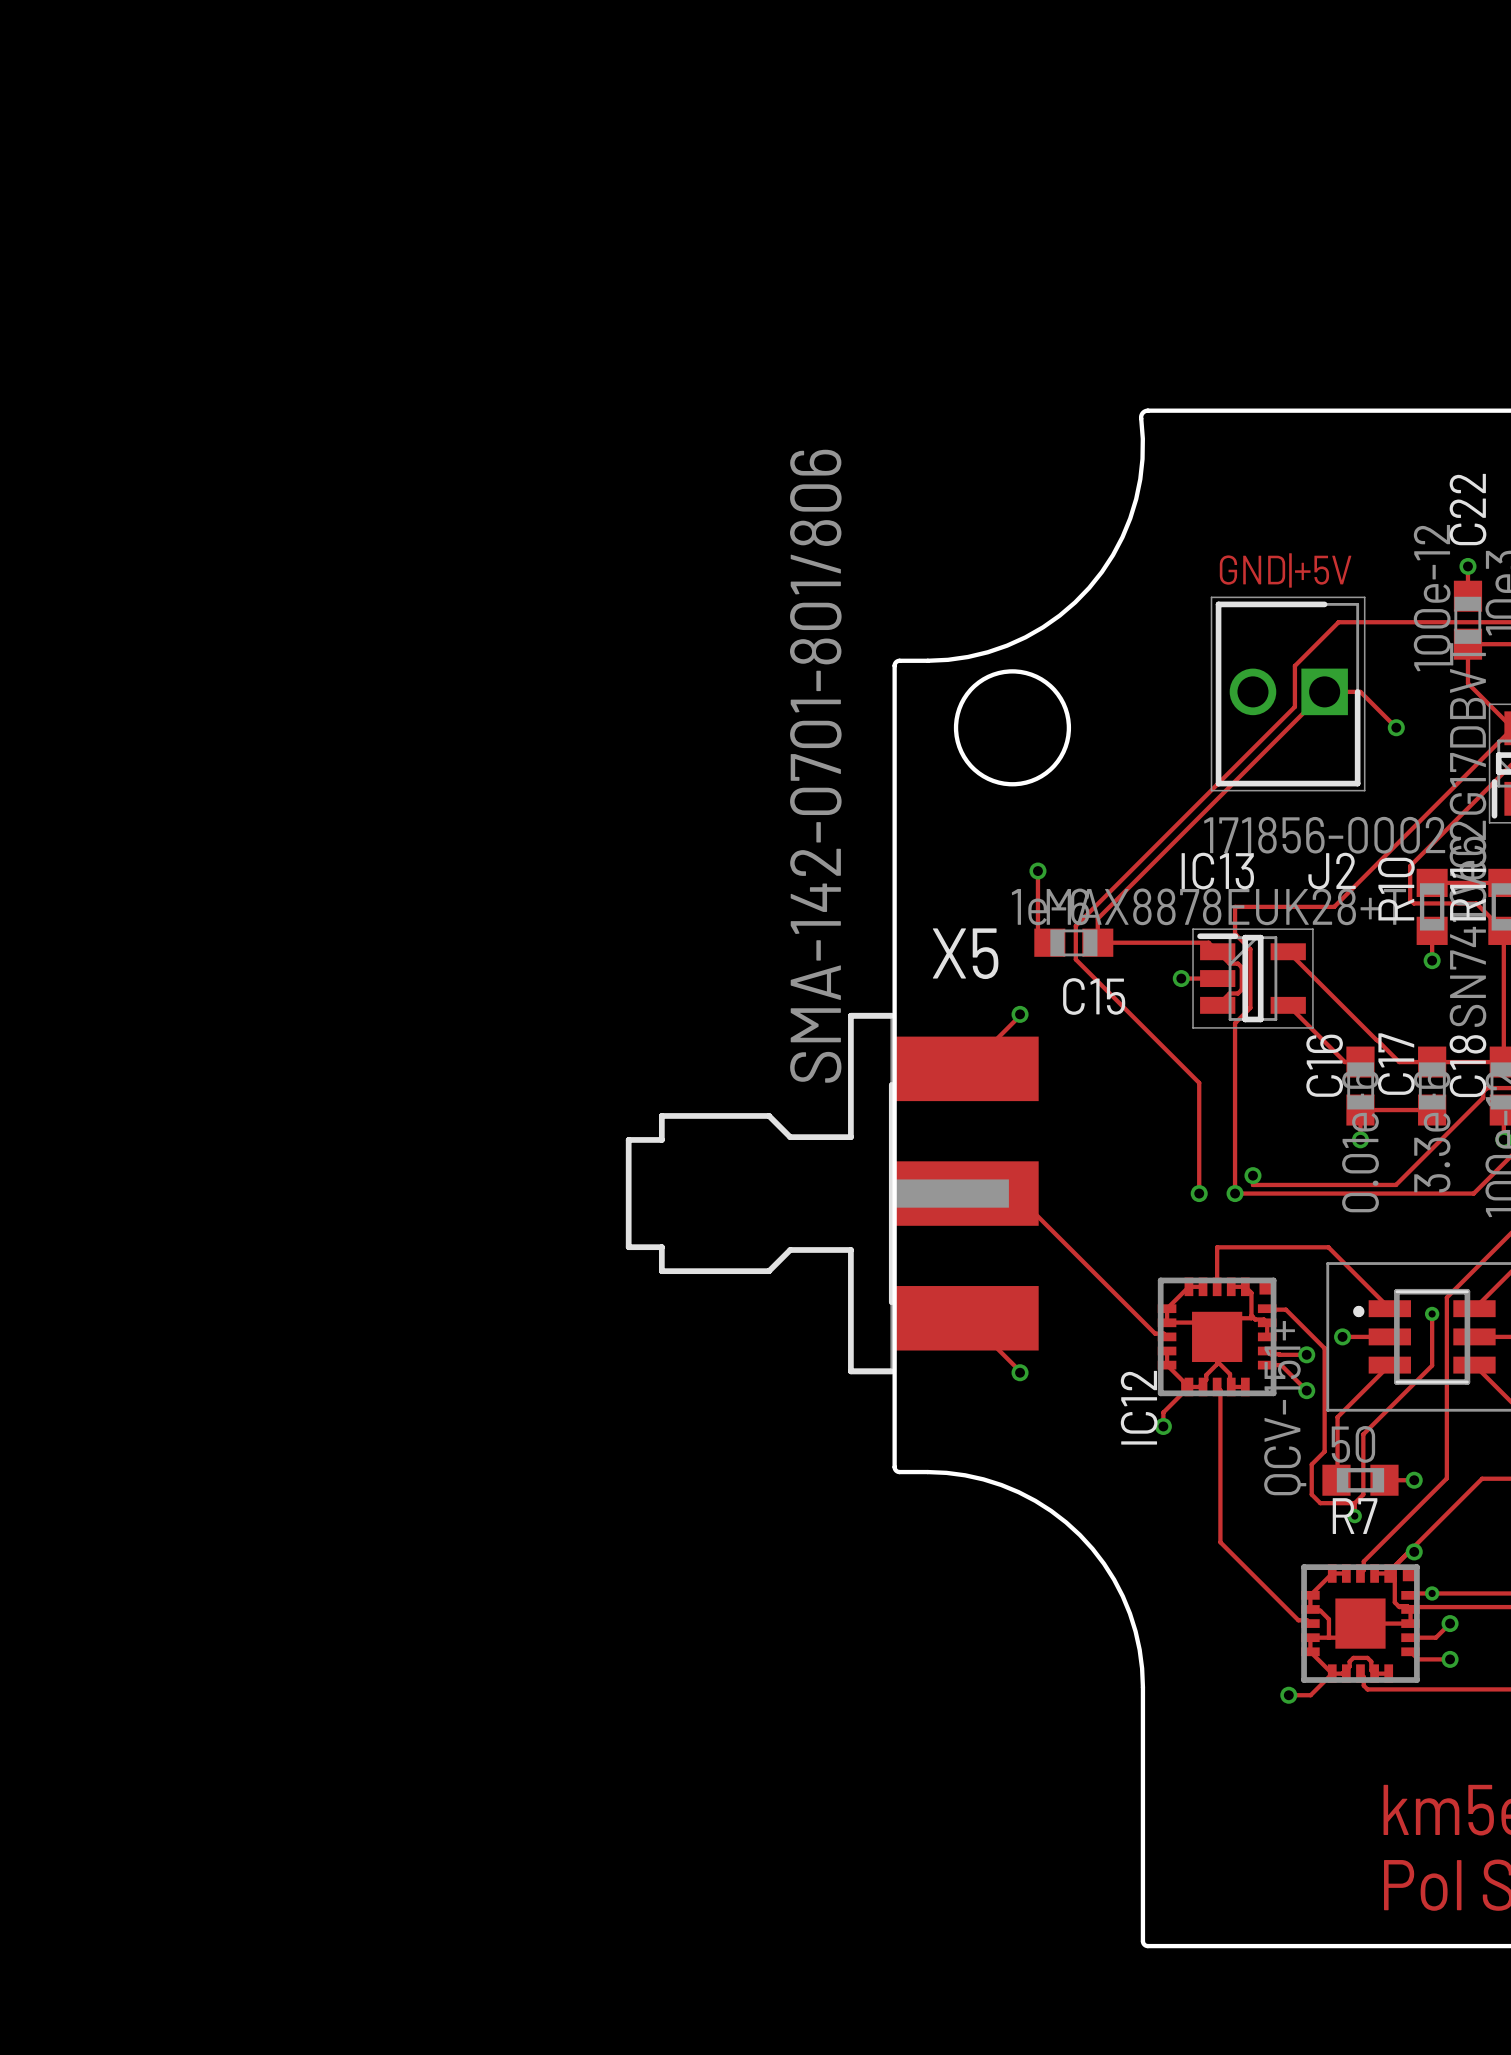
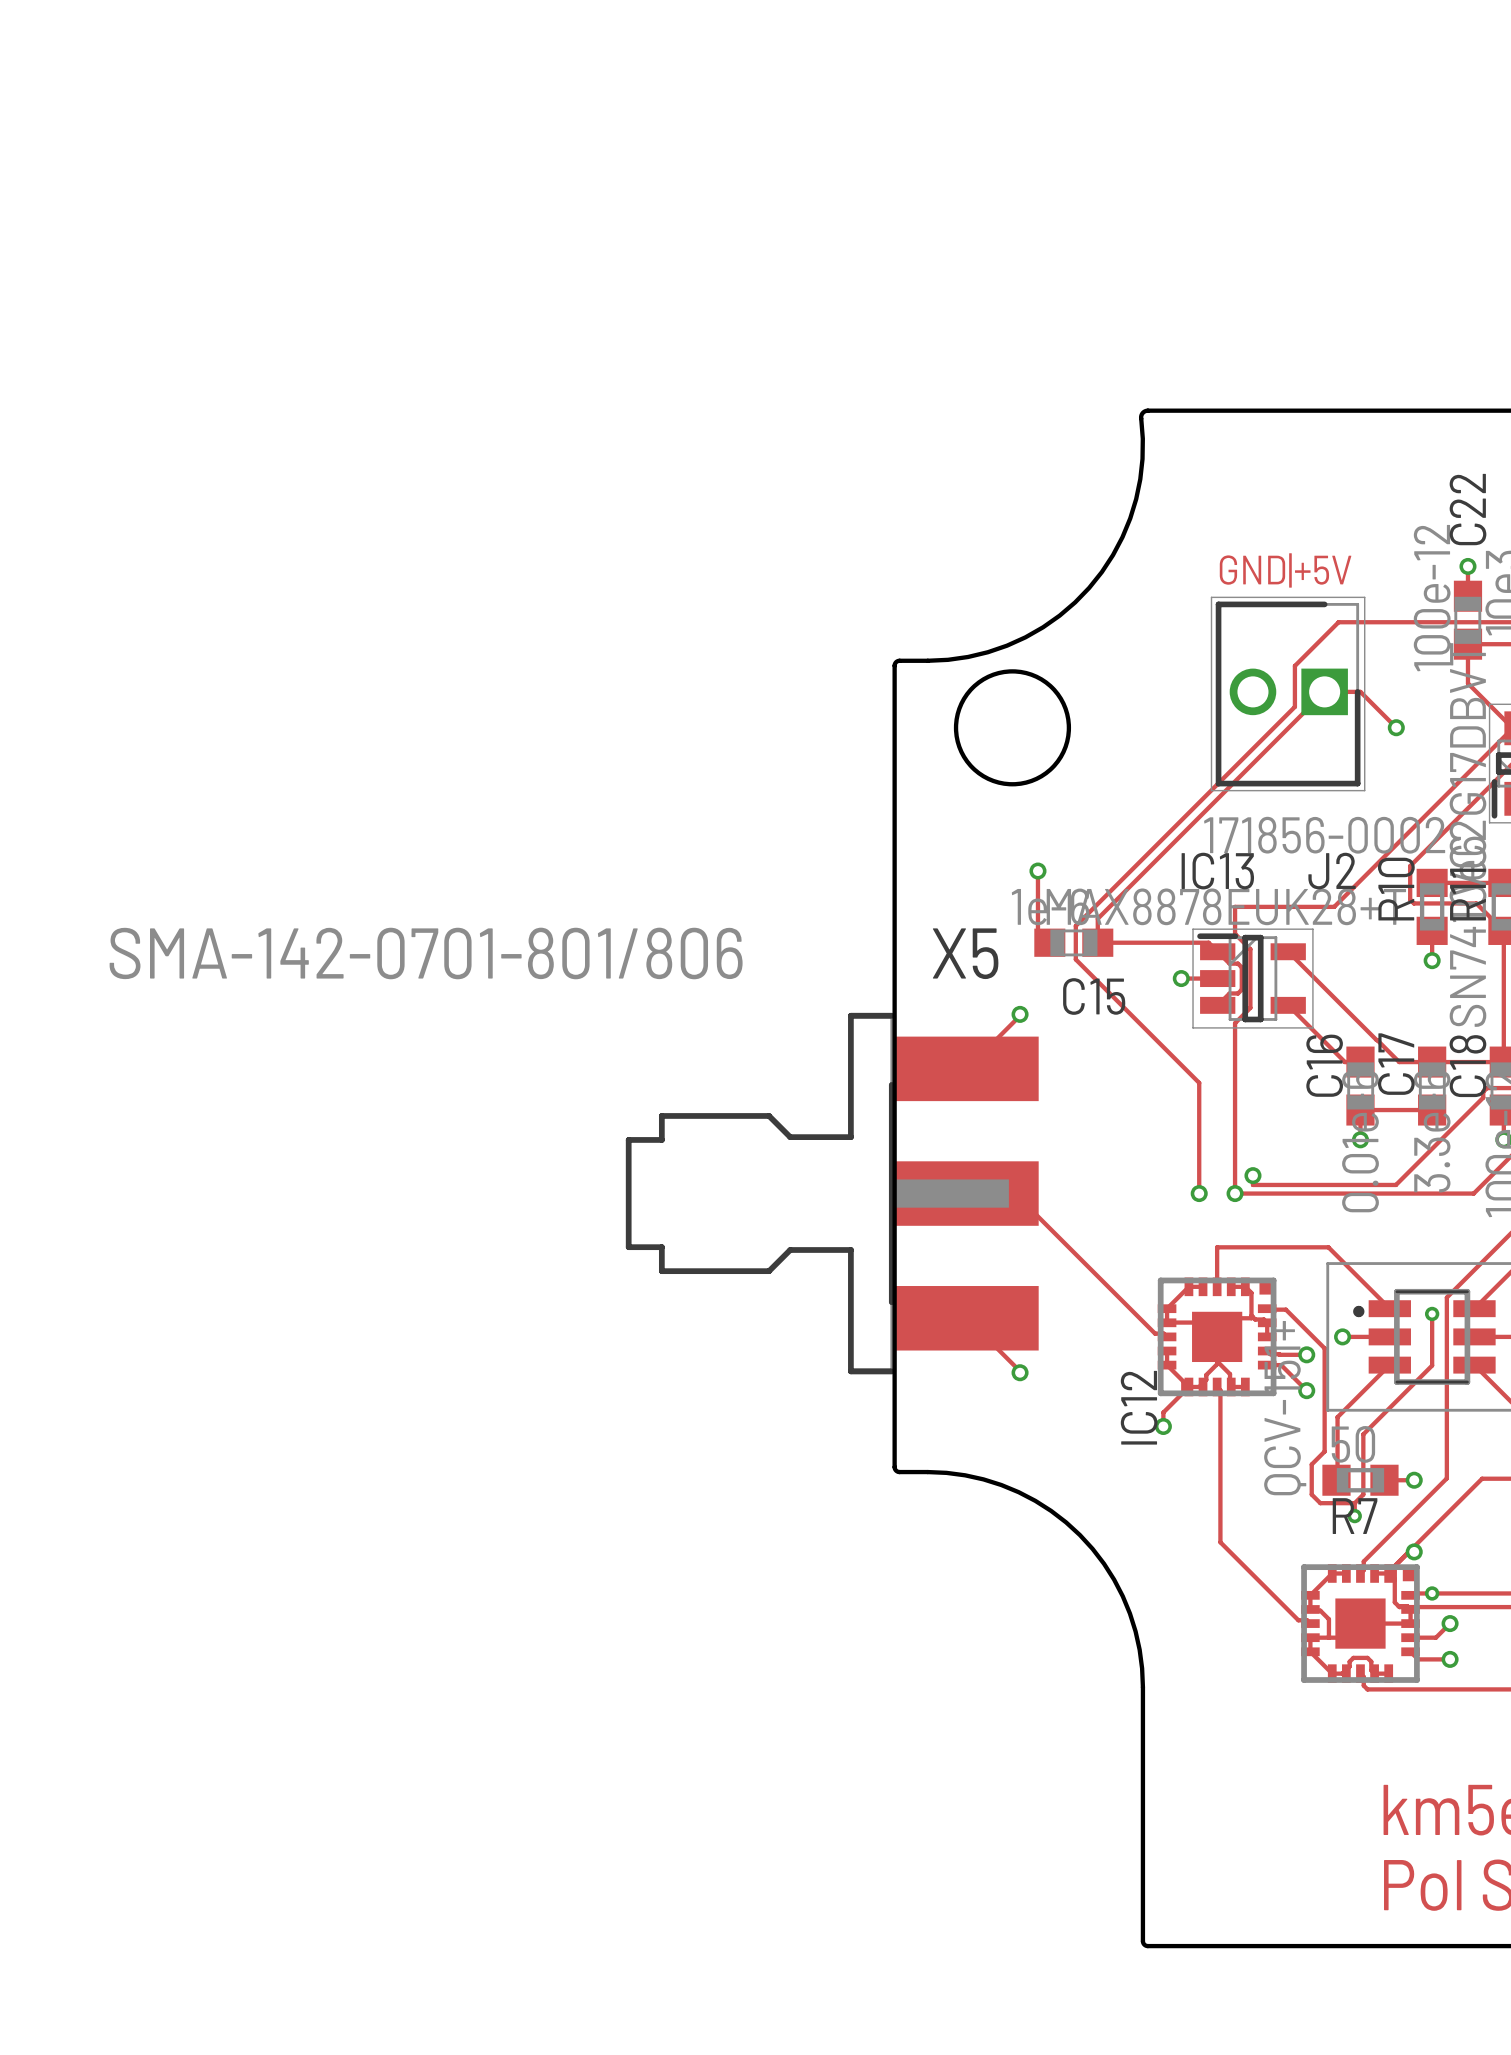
X5 value rotation: 0° (815, 766) -> 90° clockwise (426, 953)
track: (1332, 1673) (1310, 1695) (1288, 1695) -> none
via: (1288, 1695) -> none

